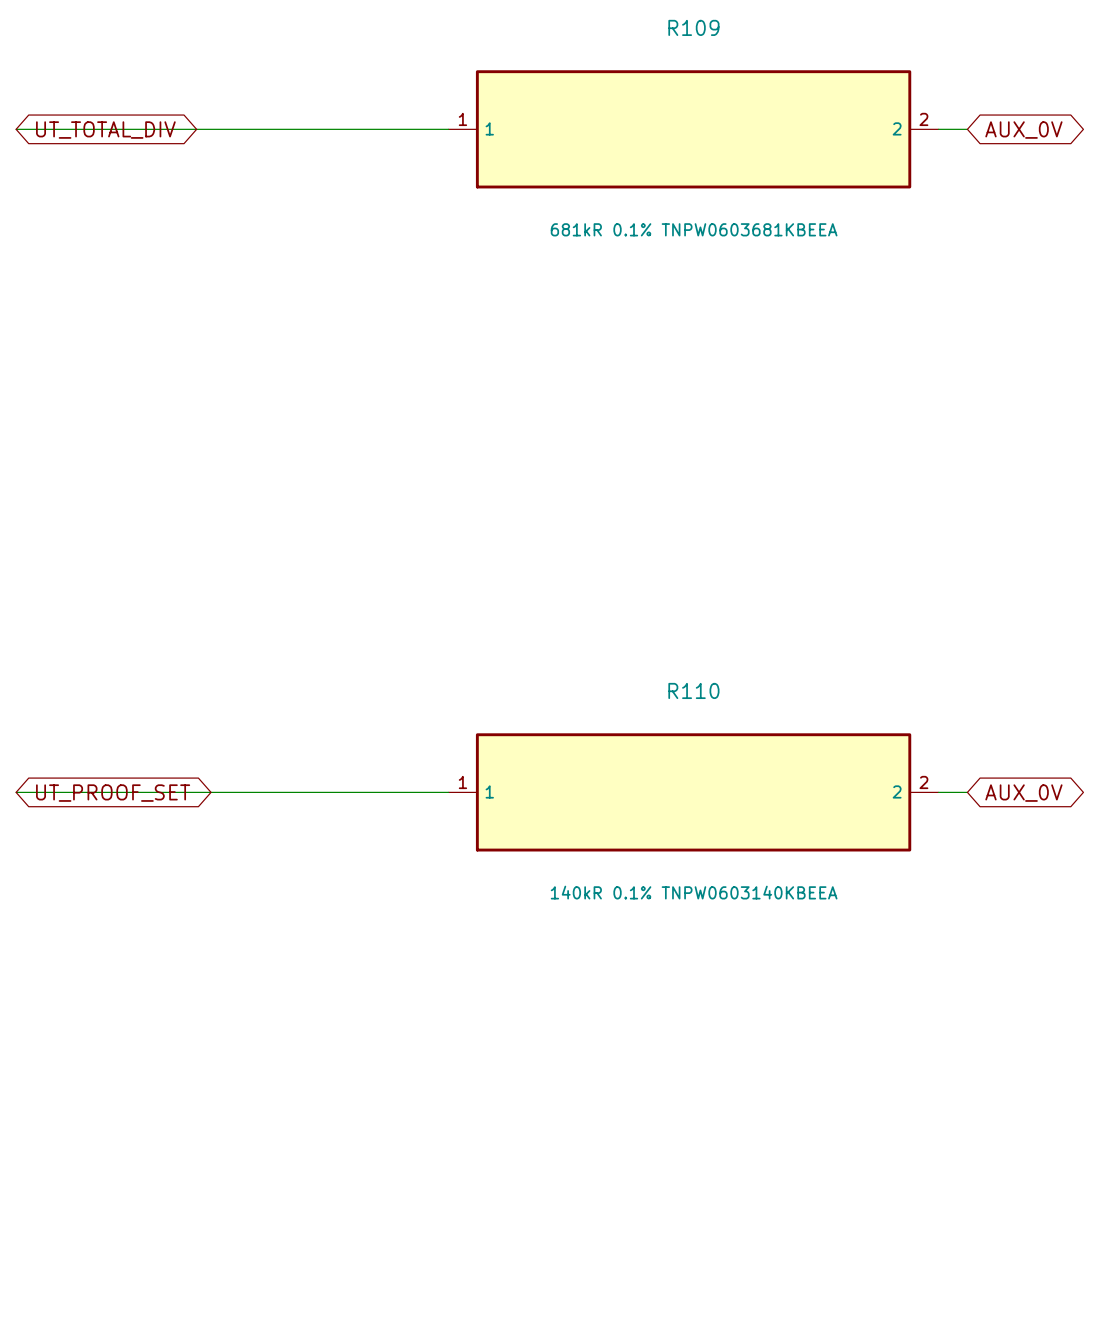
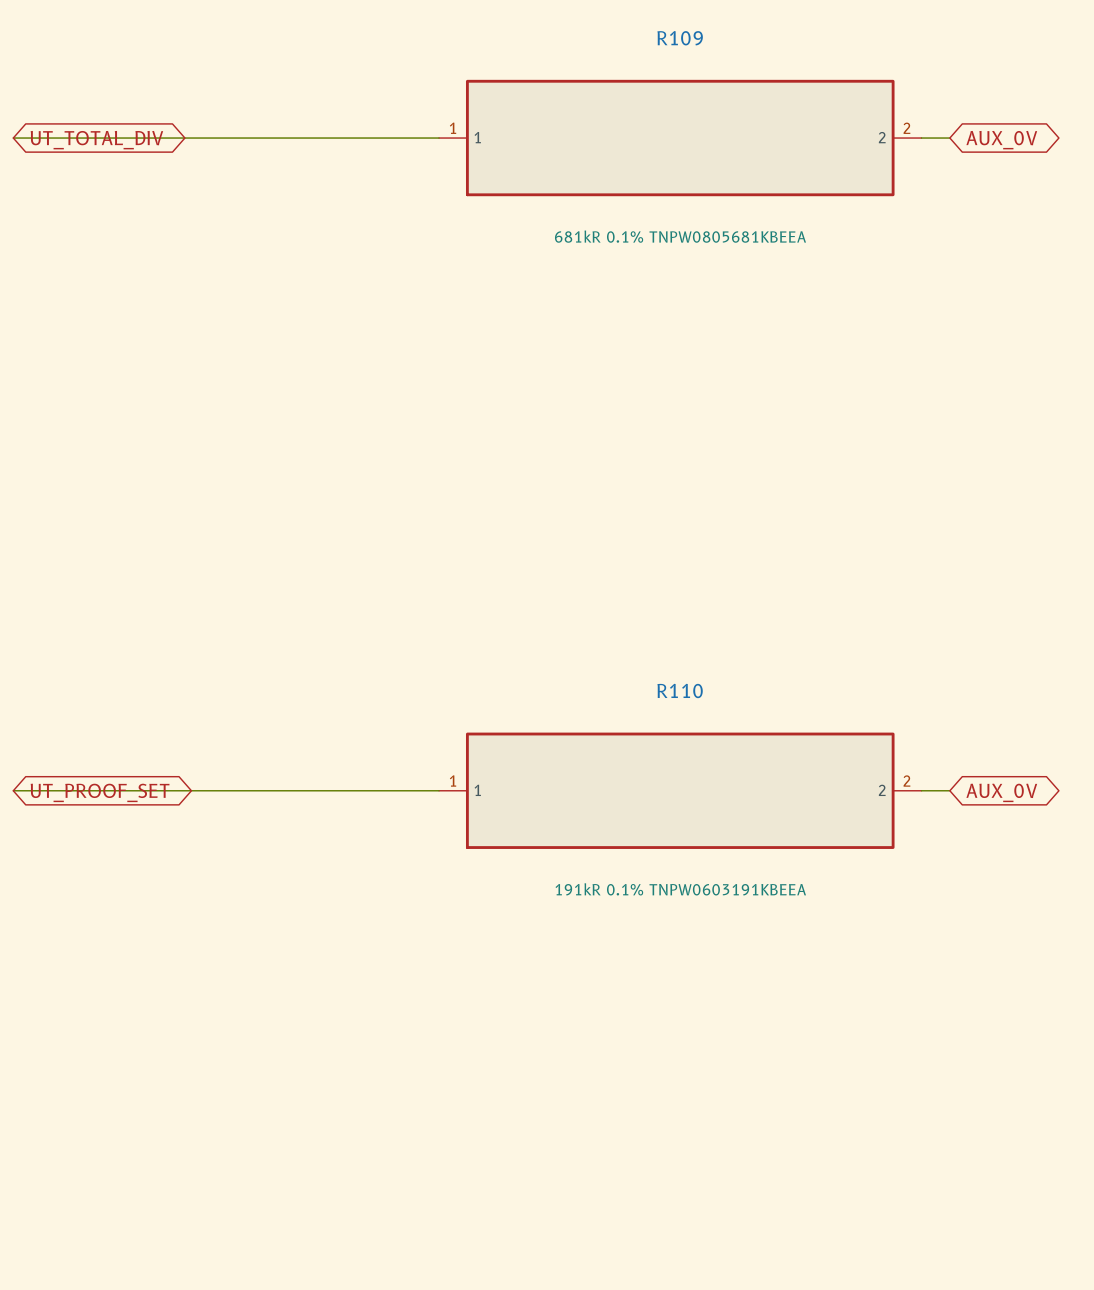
R109 value: 681kR 0.1% TNPW0603681KBEEA (694, 229) -> 681kR 0.1% TNPW0805681KBEEA (680, 236)
R110 value: 140kR 0.1% TNPW0603140KBEEA (694, 892) -> 191kR 0.1% TNPW0603191KBEEA (680, 889)

